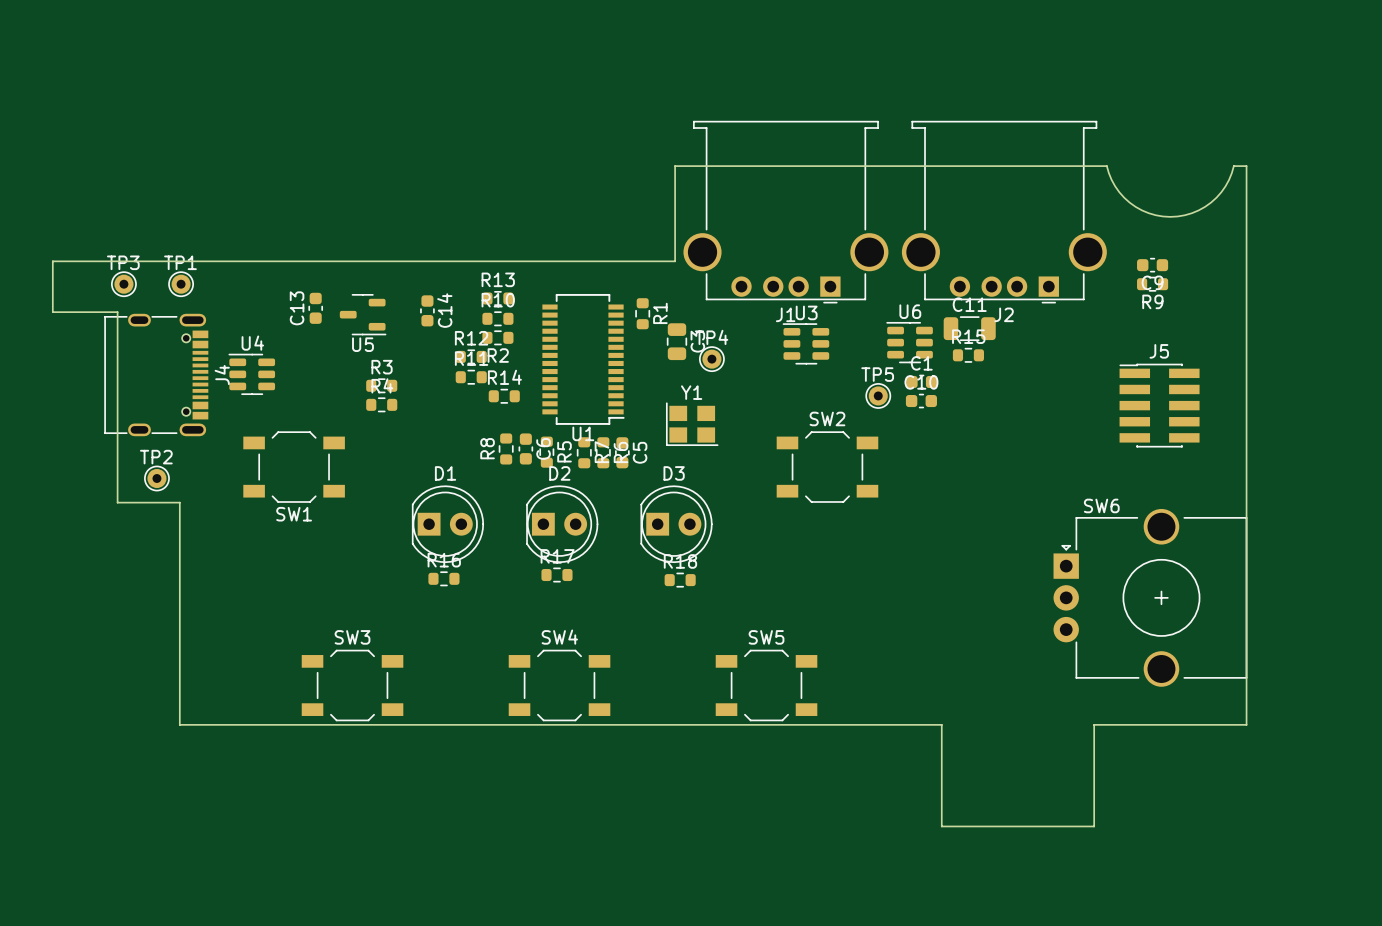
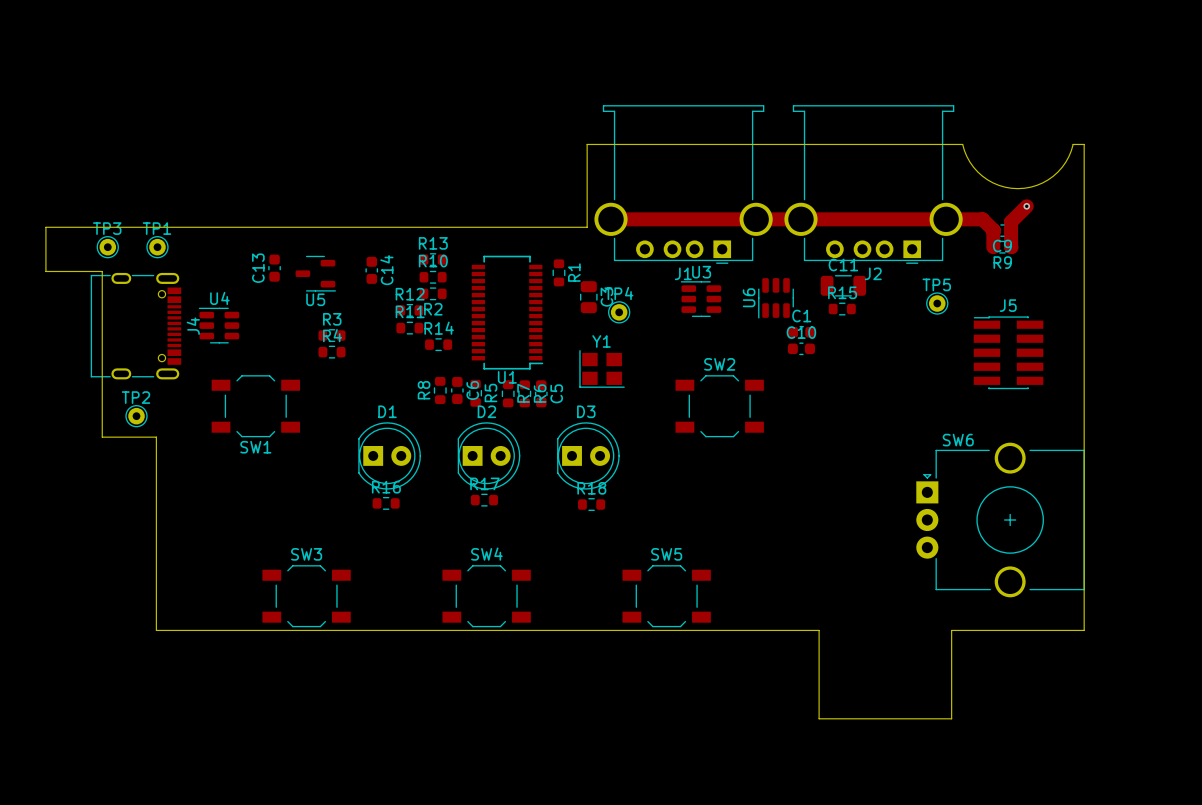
track: none -> (1026, 206) (1011, 222) (1011, 247)
via: none -> (1026, 206)
track: none -> (611, 219) (982, 219) (993, 230) (993, 247)
U6 rotation: 0° (909, 342) -> 90° counterclockwise (776, 298)
TP5 position: (878, 395) -> (937, 303)

